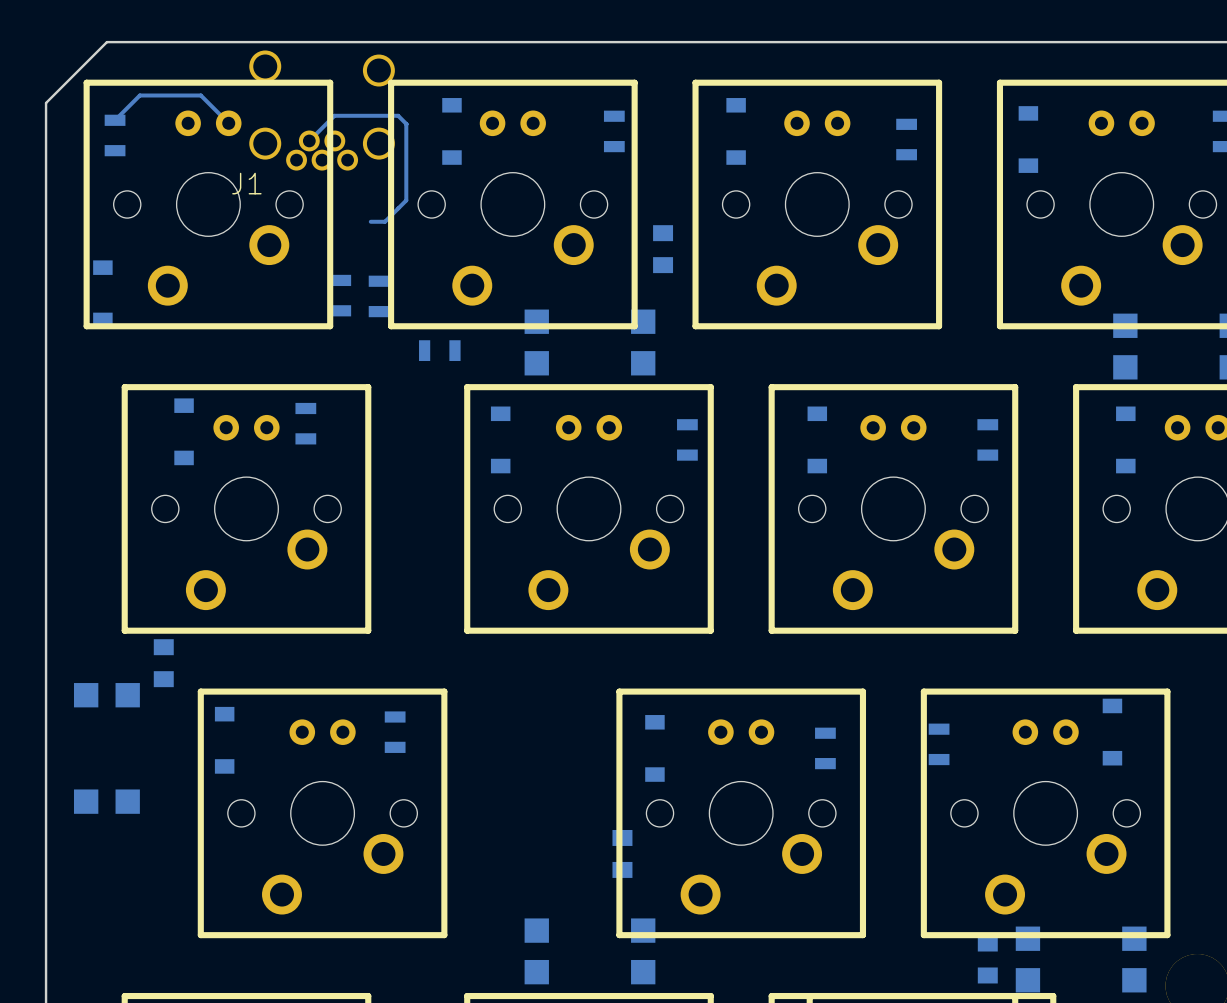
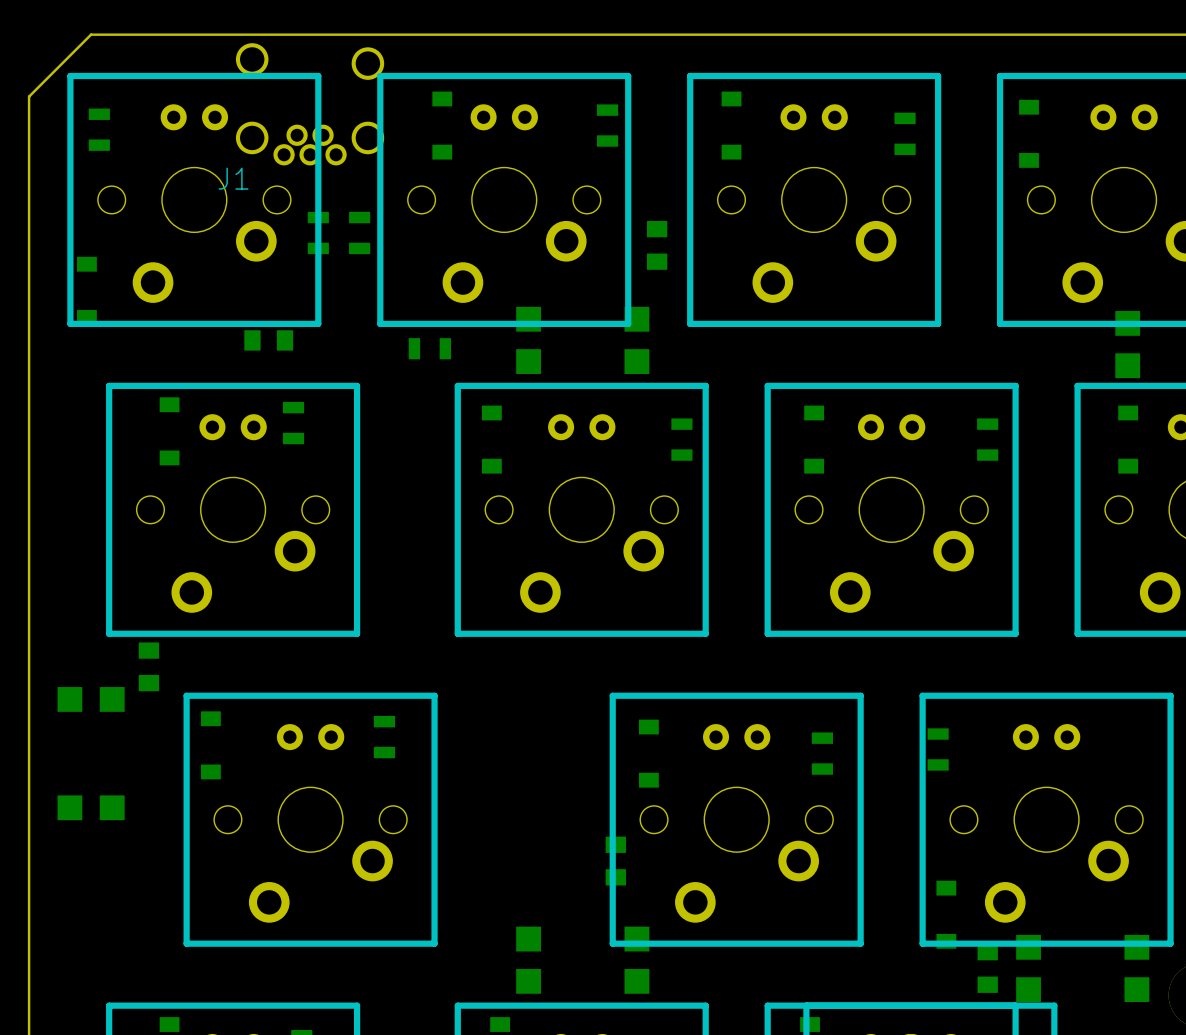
bottom track: (115, 120) (139, 95) (200, 95) (228, 123) -> none
bottom track: (406, 124) (406, 200) (384, 221) (370, 221) -> none
bottom track: (406, 124) (398, 115) (334, 115) (309, 140) -> none
part: none -> (318, 232)
part: none -> (359, 232)
part: (340, 295) -> none
part: (379, 296) -> none
part: none -> (268, 340)
part position: (1112, 732) -> (946, 914)

